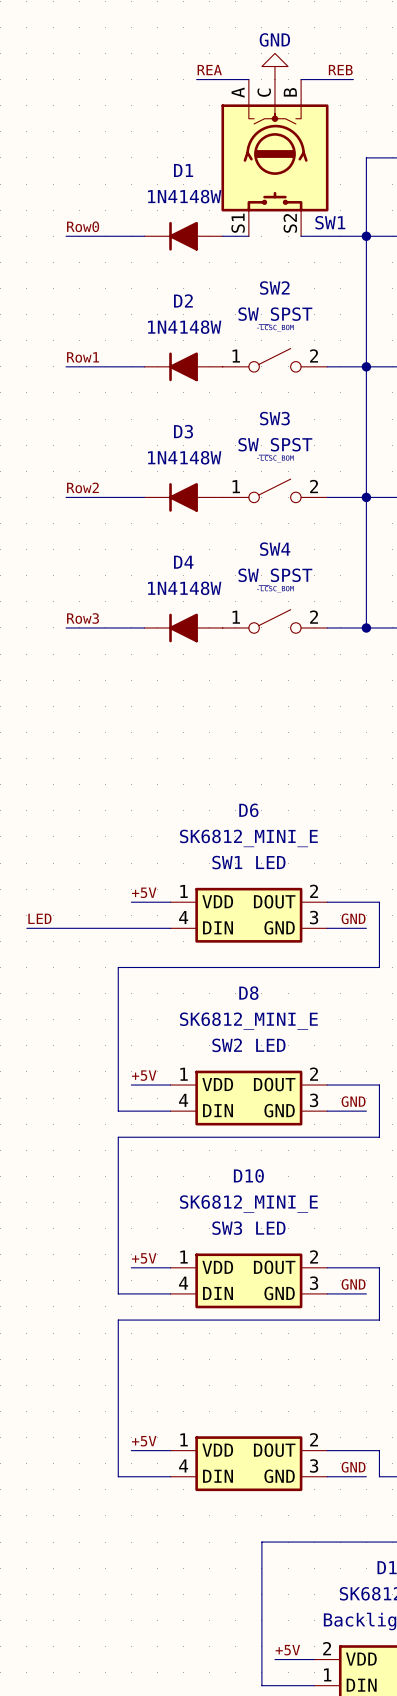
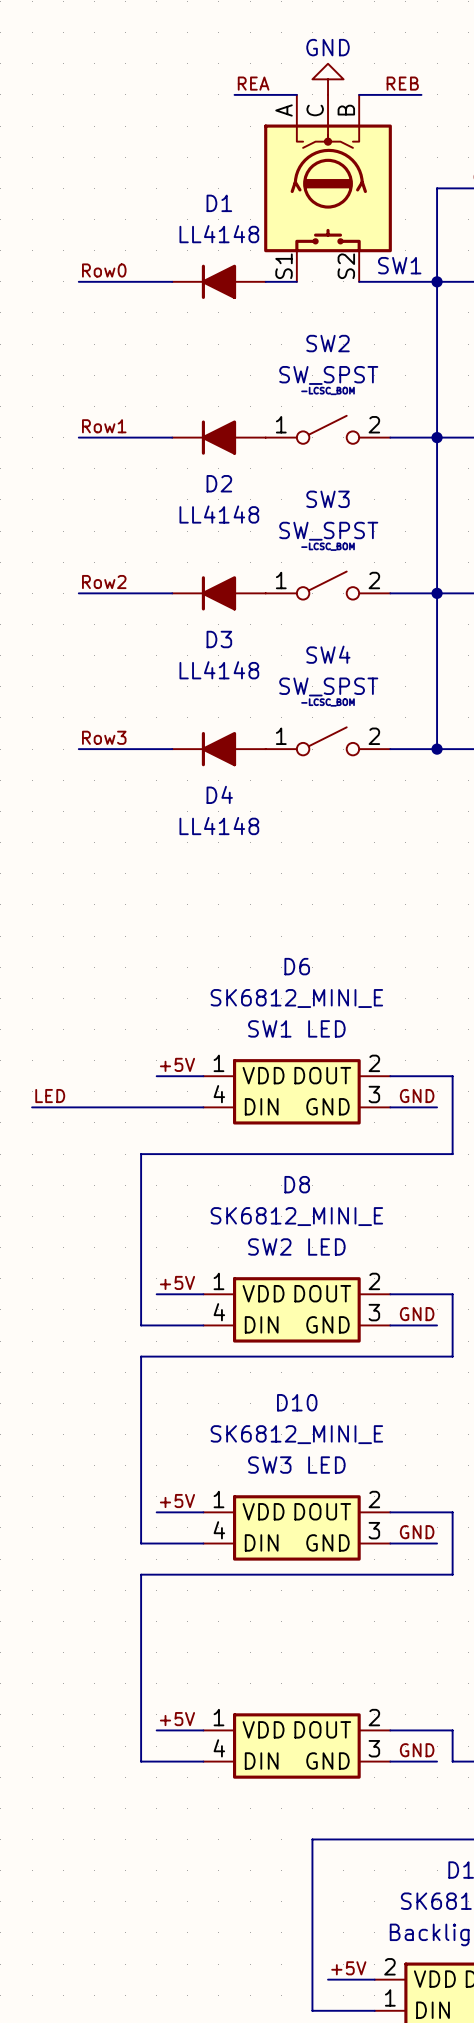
D1 value: 1N4148W (184, 196) -> LL4148 (219, 234)
D2 name position: D2 (183, 300) -> D2 (219, 483)
D2 value: 1N4148W (184, 327) -> LL4148 (219, 514)
D3 name position: D3 (183, 431) -> D3 (219, 639)
D3 value: 1N4148W (184, 457) -> LL4148 (219, 670)
D4 name position: D4 (183, 562) -> D4 (219, 794)
D4 value: 1N4148W (184, 588) -> LL4148 (219, 826)

